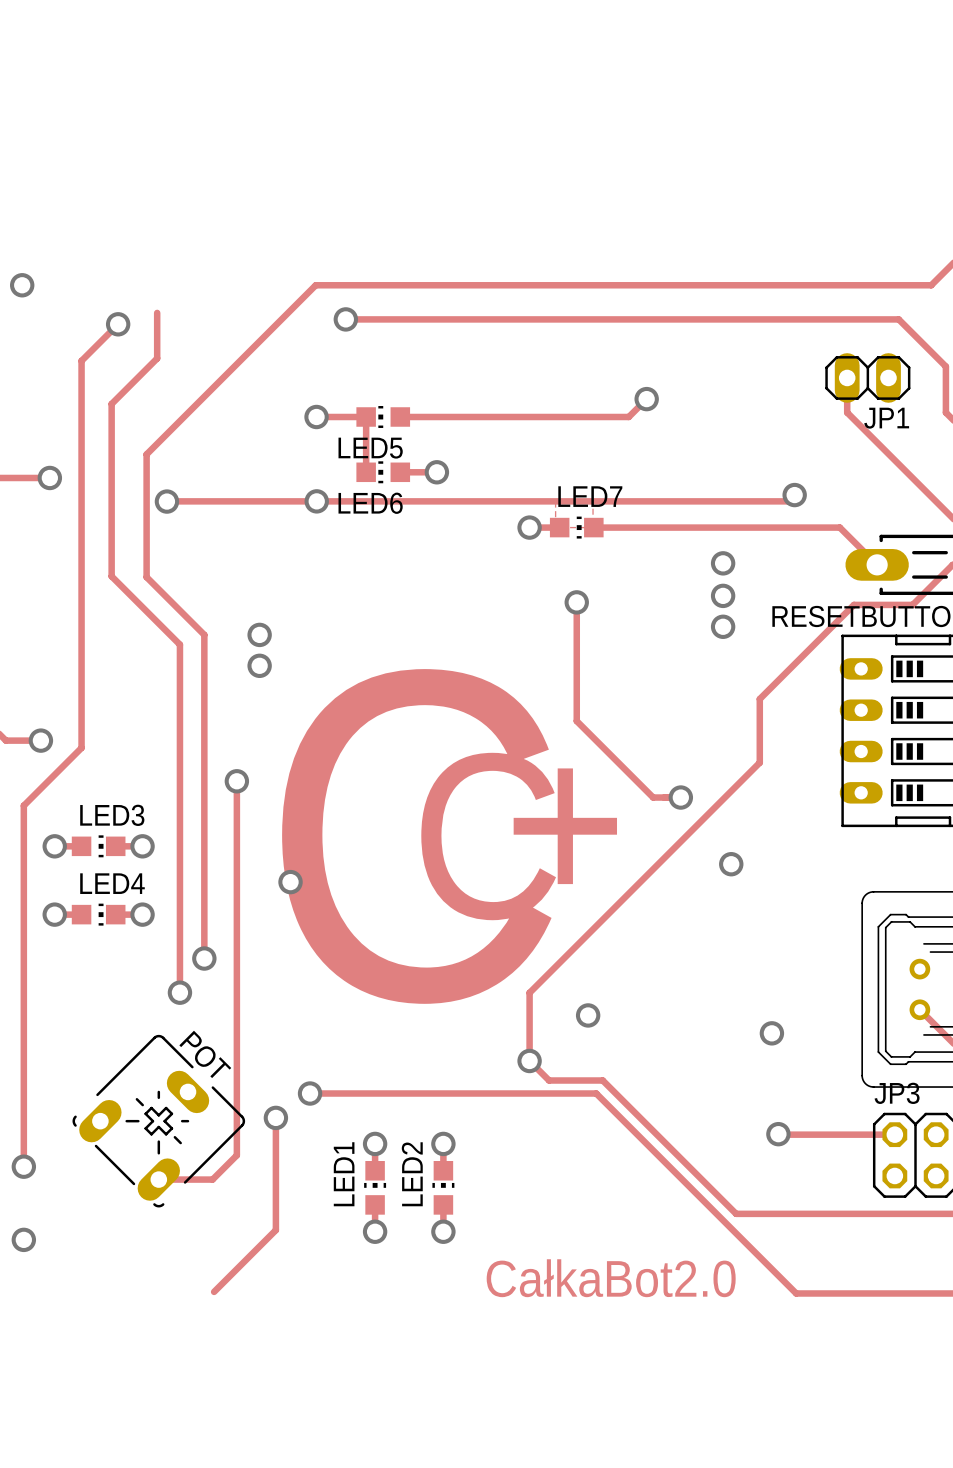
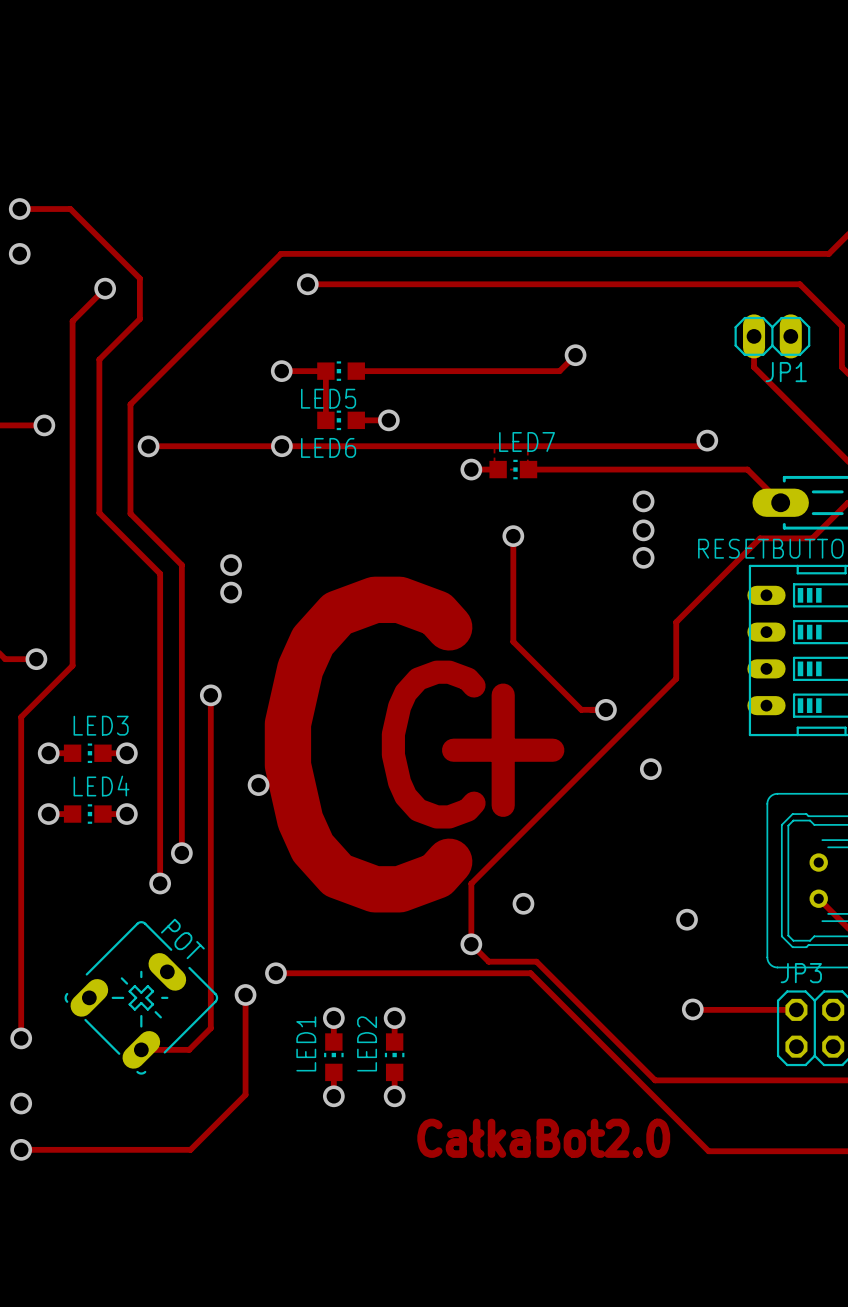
track: none -> (19, 209) (70, 209) (139, 278)
via: none -> (19, 209)
track: none -> (21, 1149) (190, 1149)
via: none -> (21, 1149)

